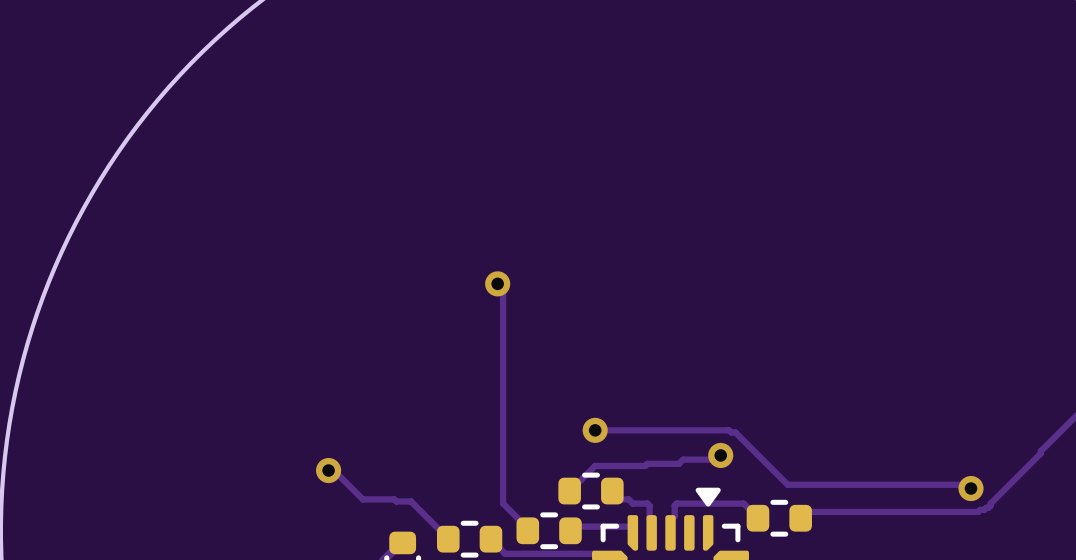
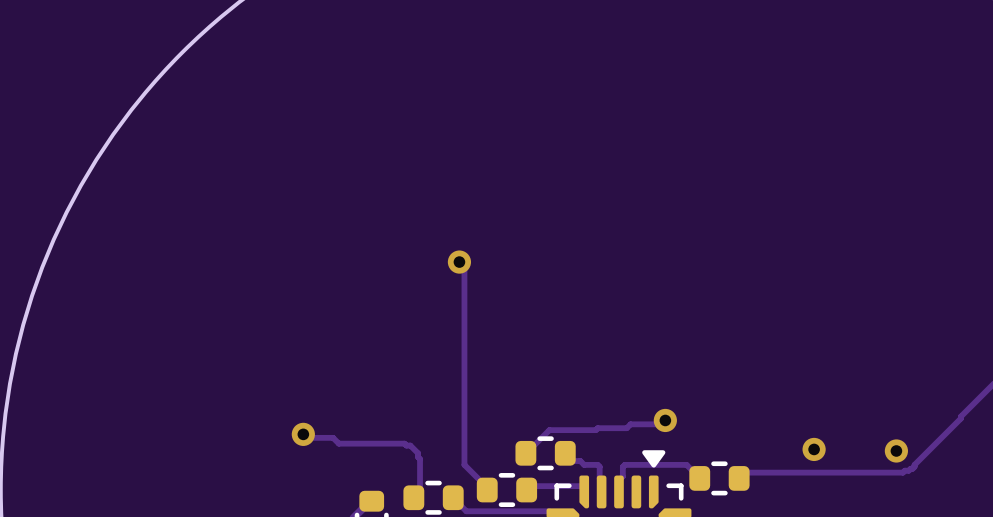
track: (595, 430) (729, 430) (735, 432) (787, 484) (961, 484) -> none
via: (595, 430) -> none
track: (337, 474) (362, 499) (411, 501) (440, 530) -> (311, 437) (333, 437) (338, 443) (404, 443) (410, 445) (418, 453) (420, 459) (420, 488)
via: none -> (814, 449)

